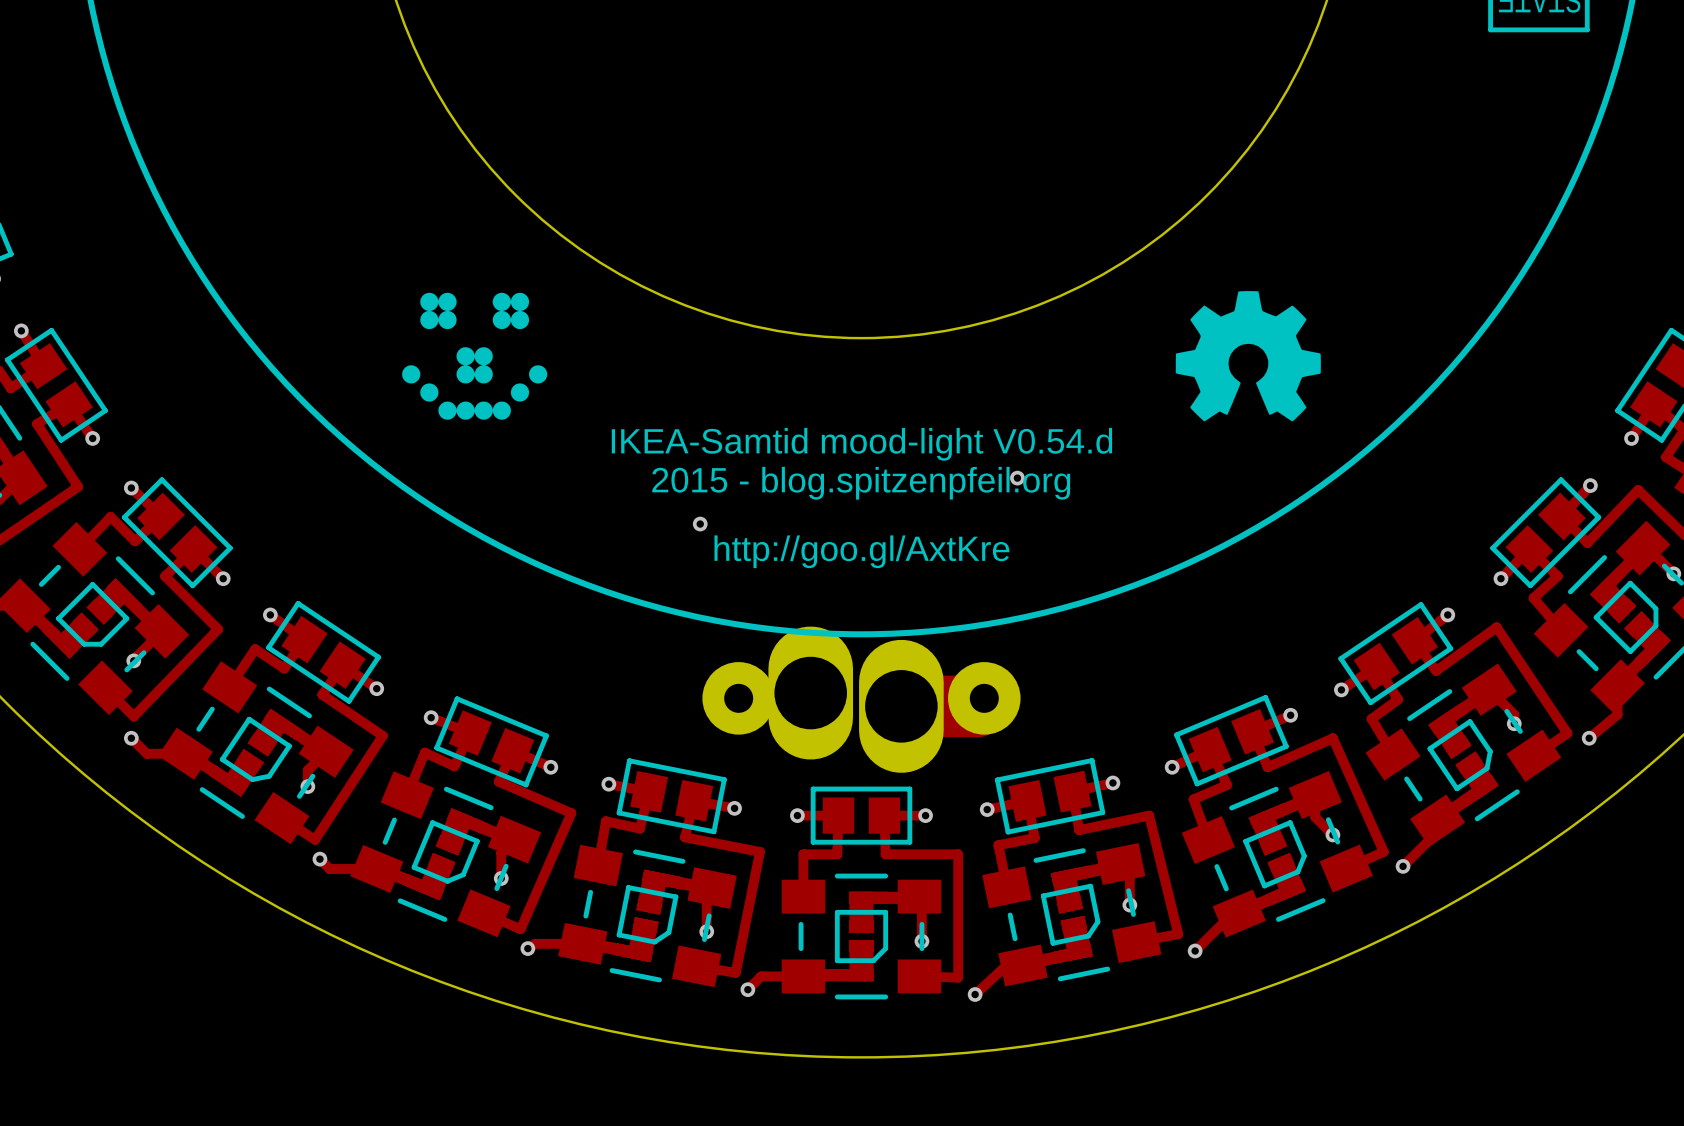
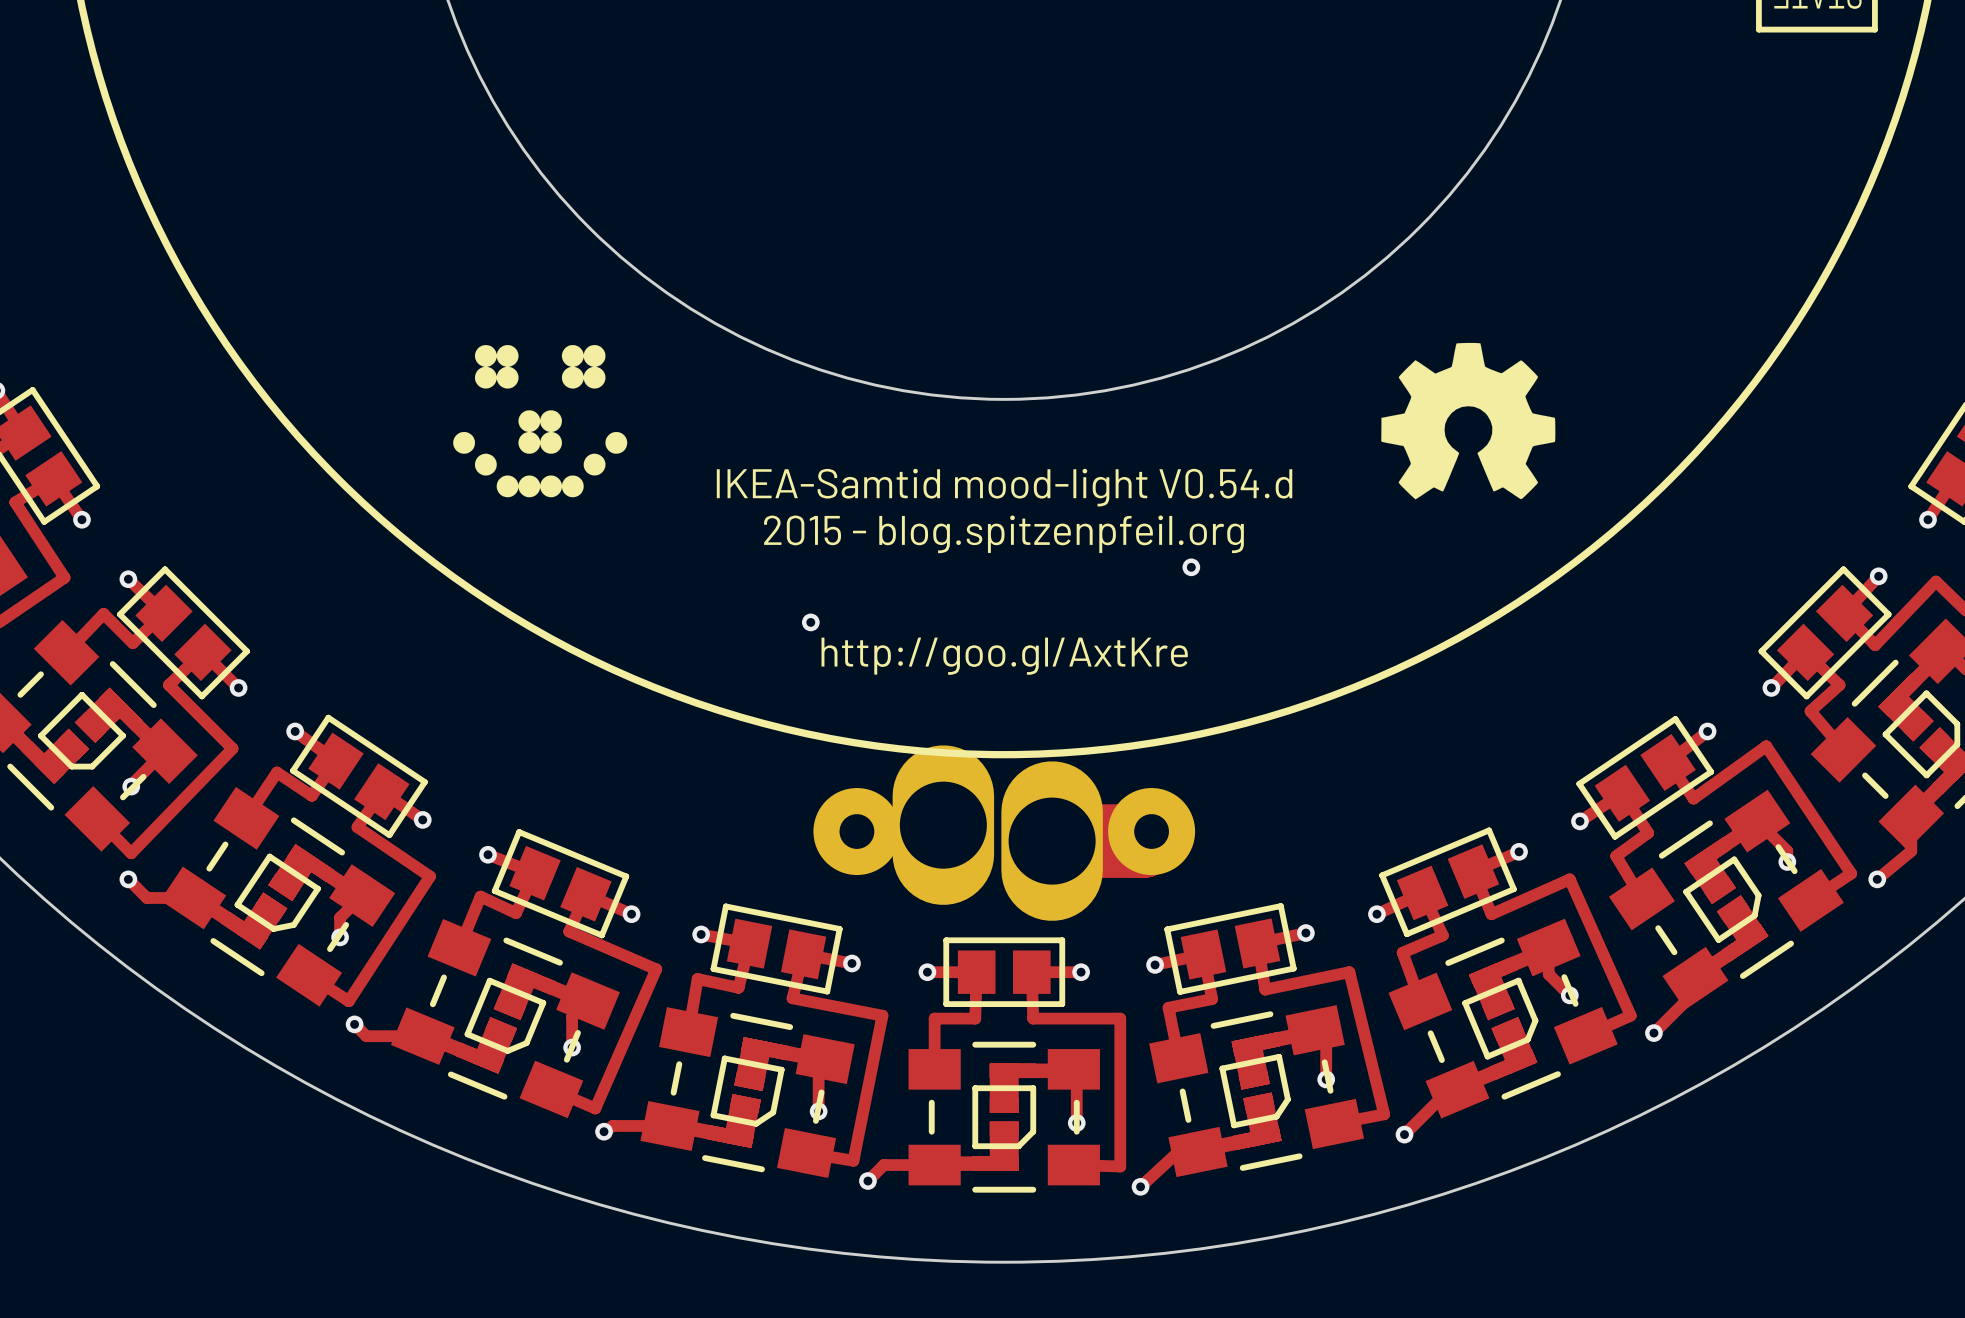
text position: IKEA-Samtid mood-light V0.54.d (861, 444) -> IKEA-Samtid mood-light V0.54.d (1004, 487)
text position: 2015 - blog.spitzenpfeil.org (861, 483) -> 2015 - blog.spitzenpfeil.org (1003, 534)

